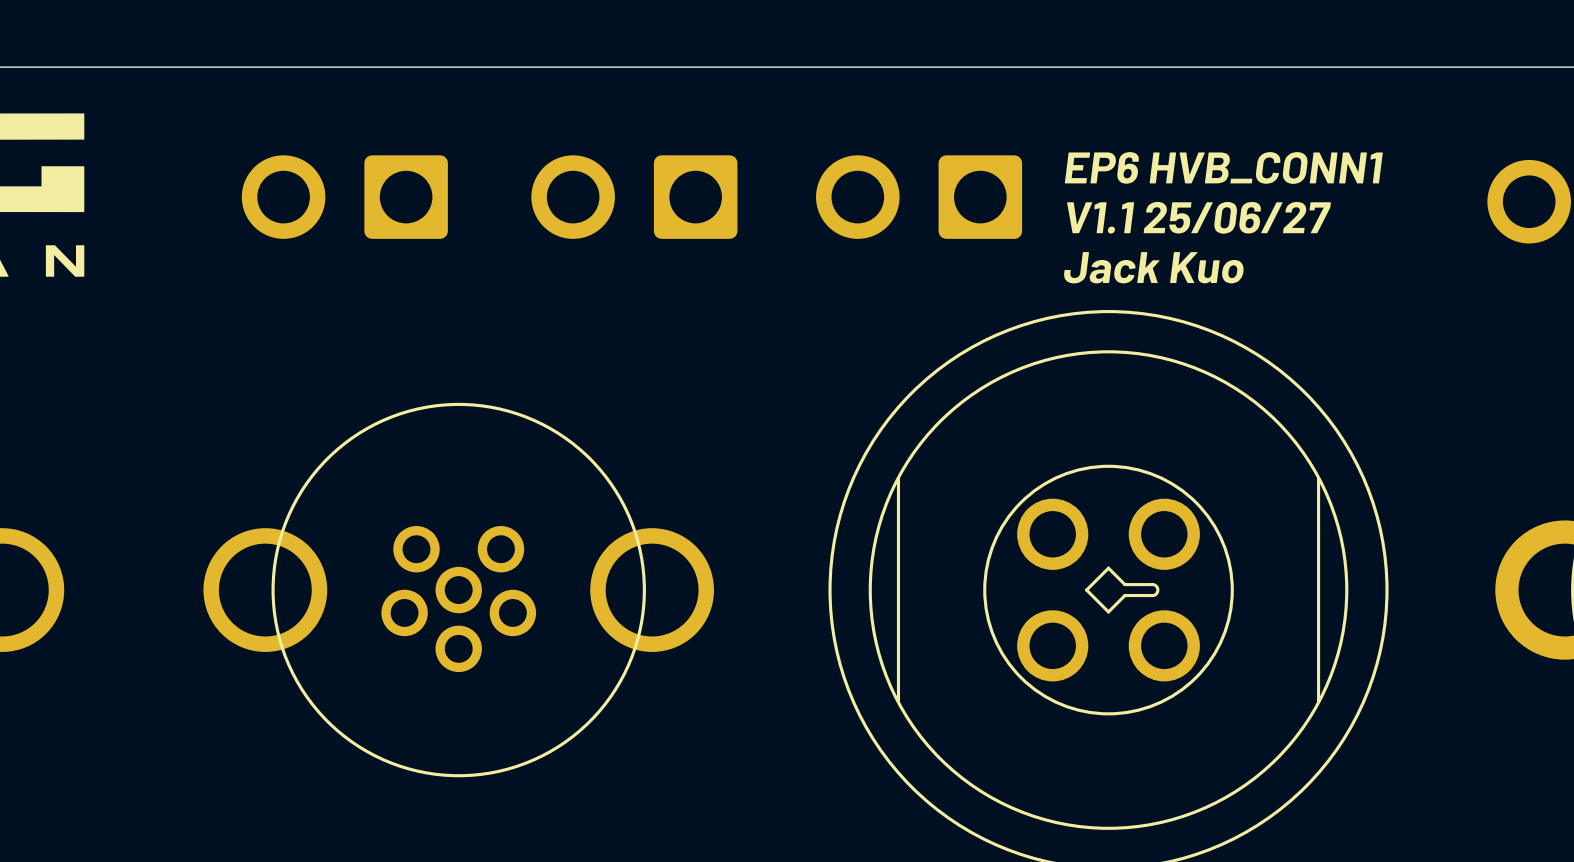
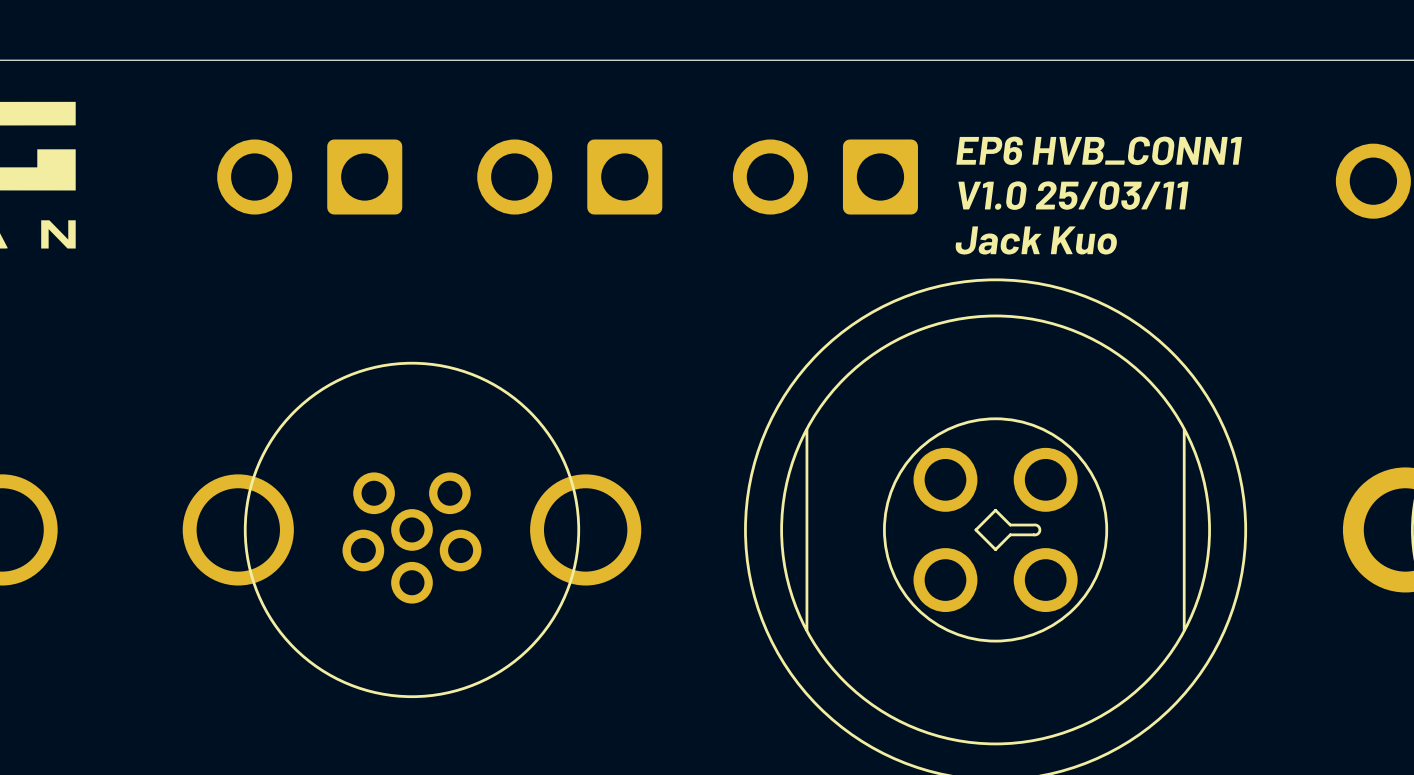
text: V1.1 25/06/27 (1199, 217) -> V1.0 25/03/11 (1073, 195)

